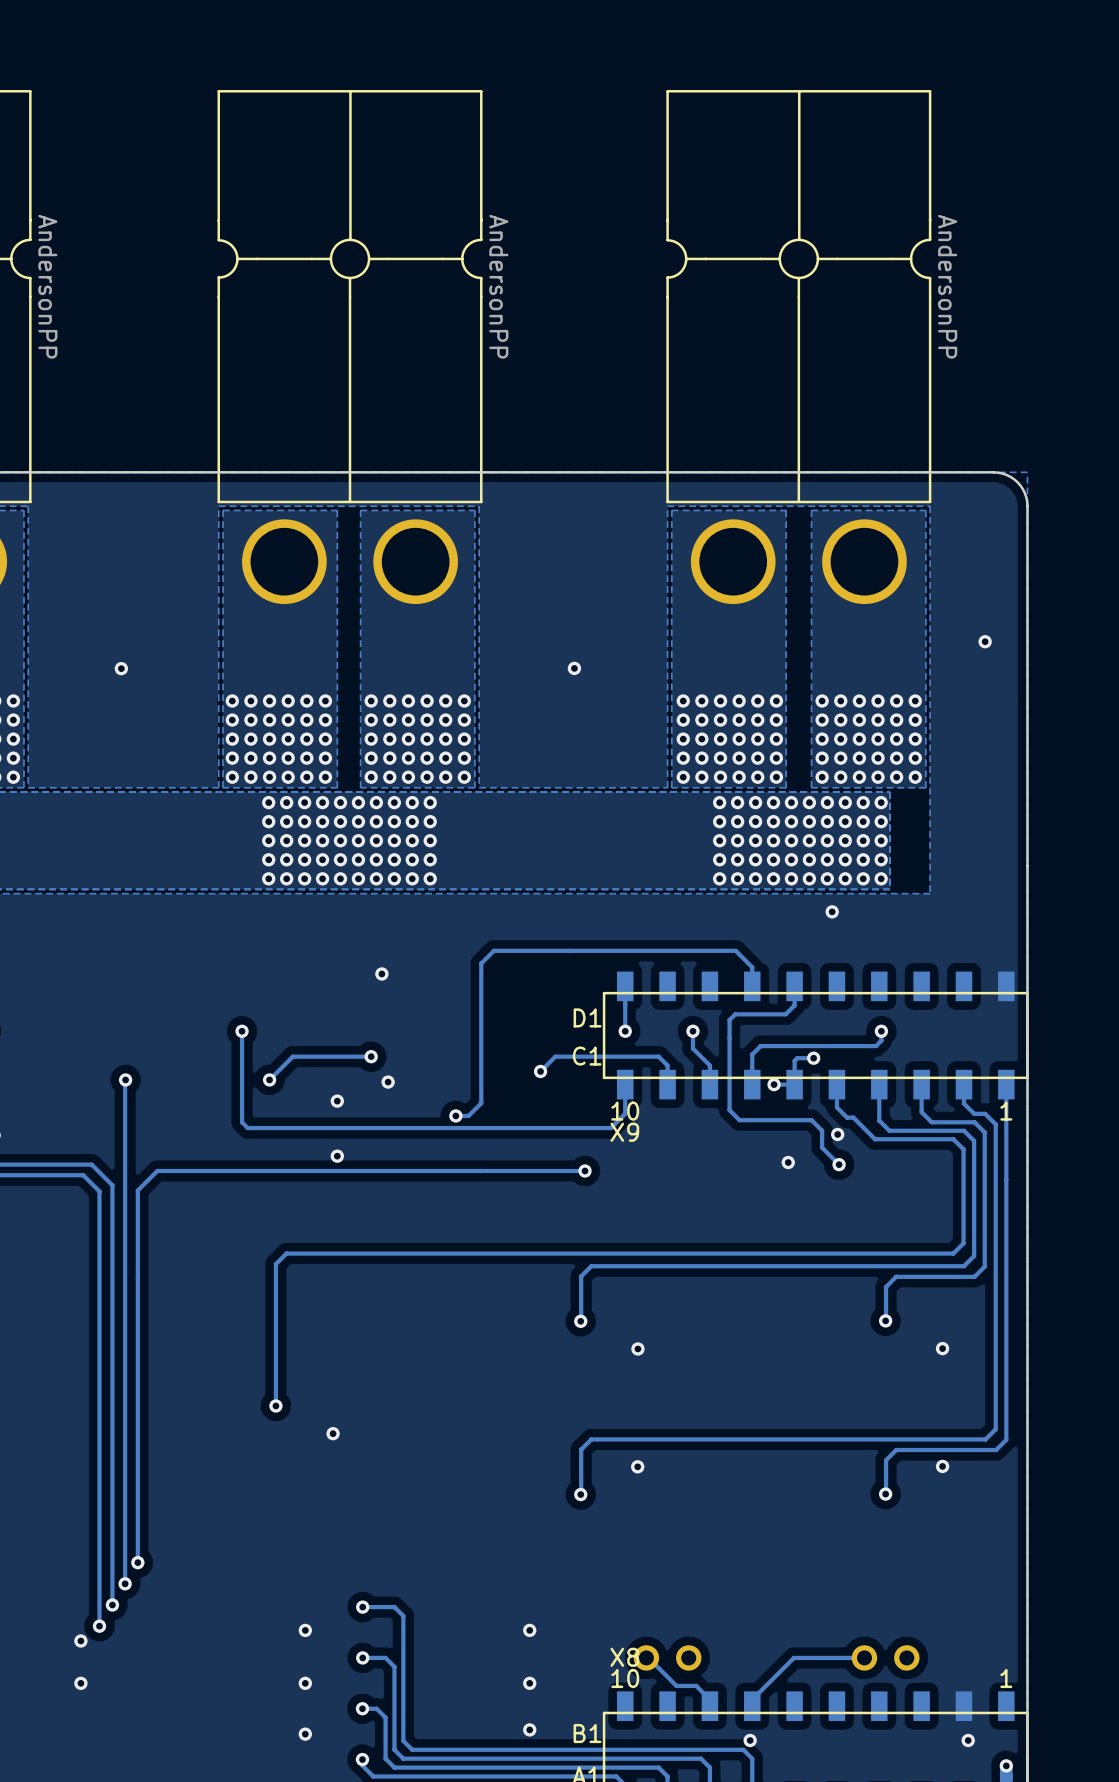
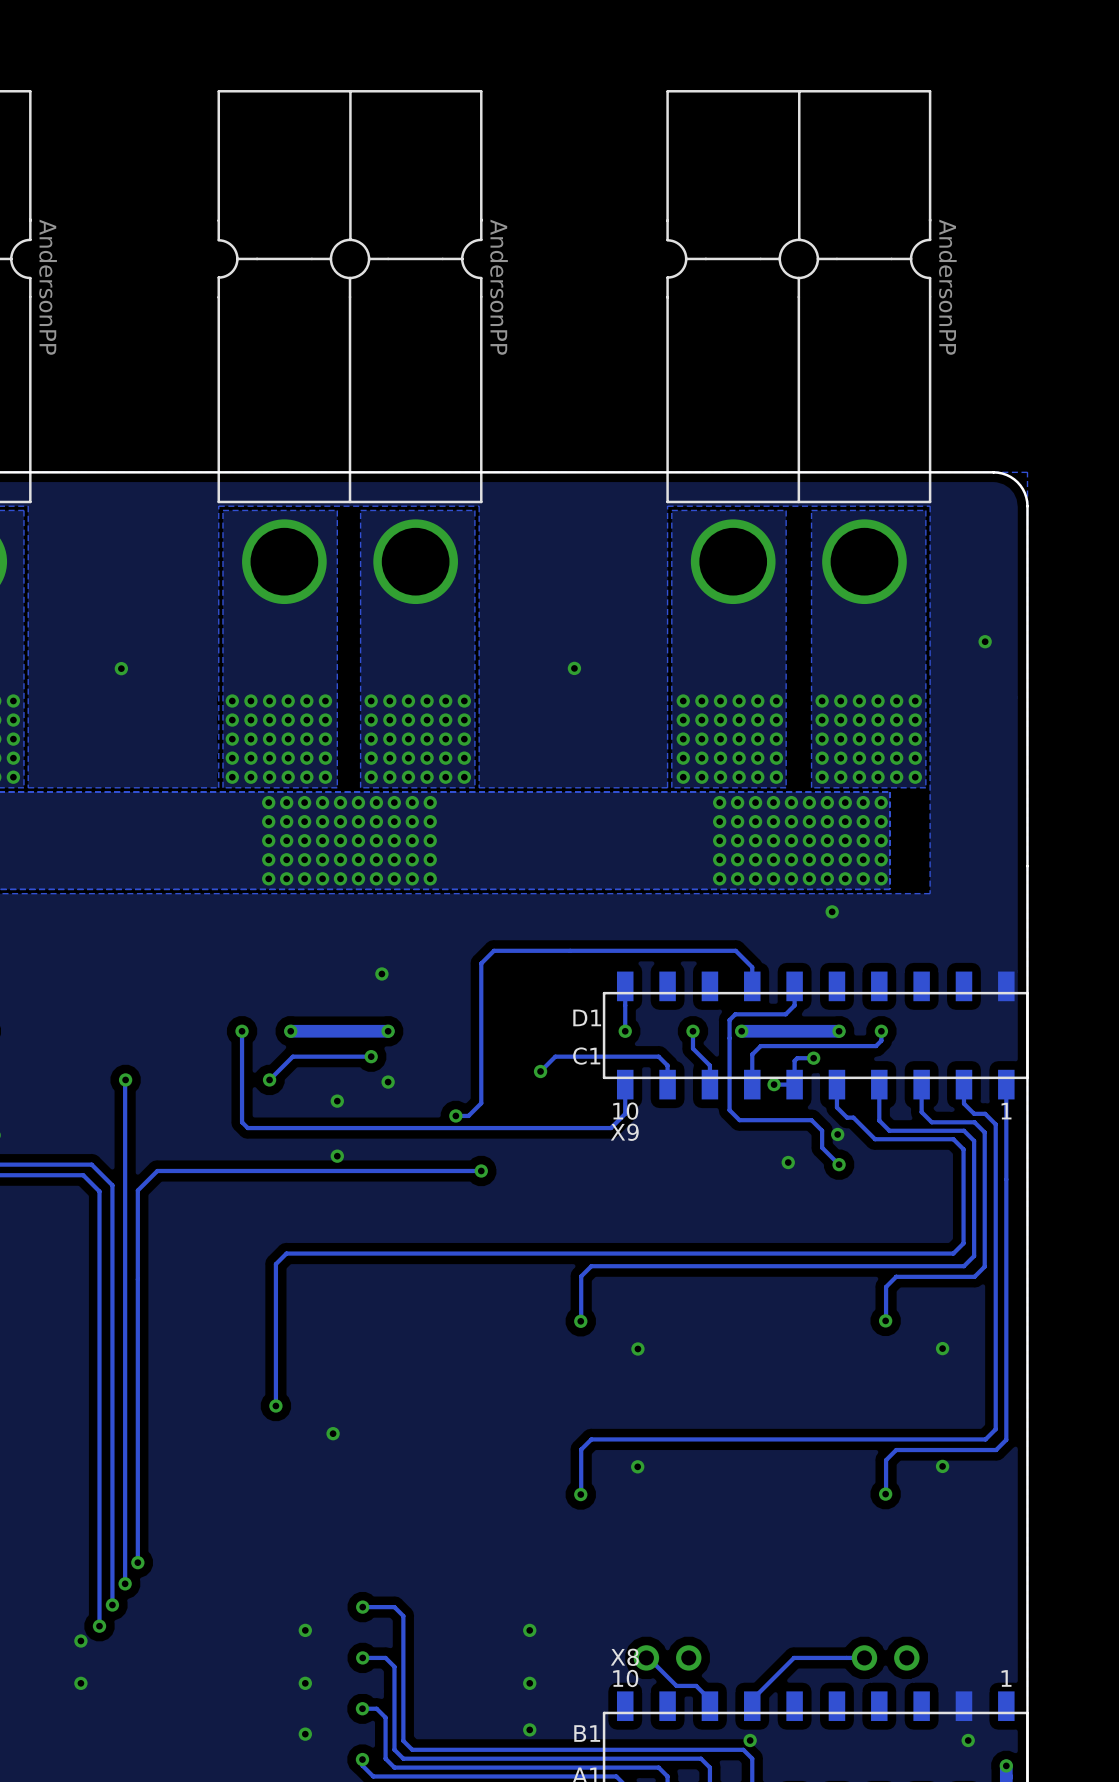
via: none -> (290, 1031)
track: none -> (388, 1031) (290, 1031)
via: none -> (388, 1031)
via: none -> (741, 1031)
track: none -> (839, 1031) (741, 1031)
via: none -> (839, 1031)
via: none -> (481, 1170)
track: (585, 1170) (481, 1170) -> none
via: (585, 1170) -> none

